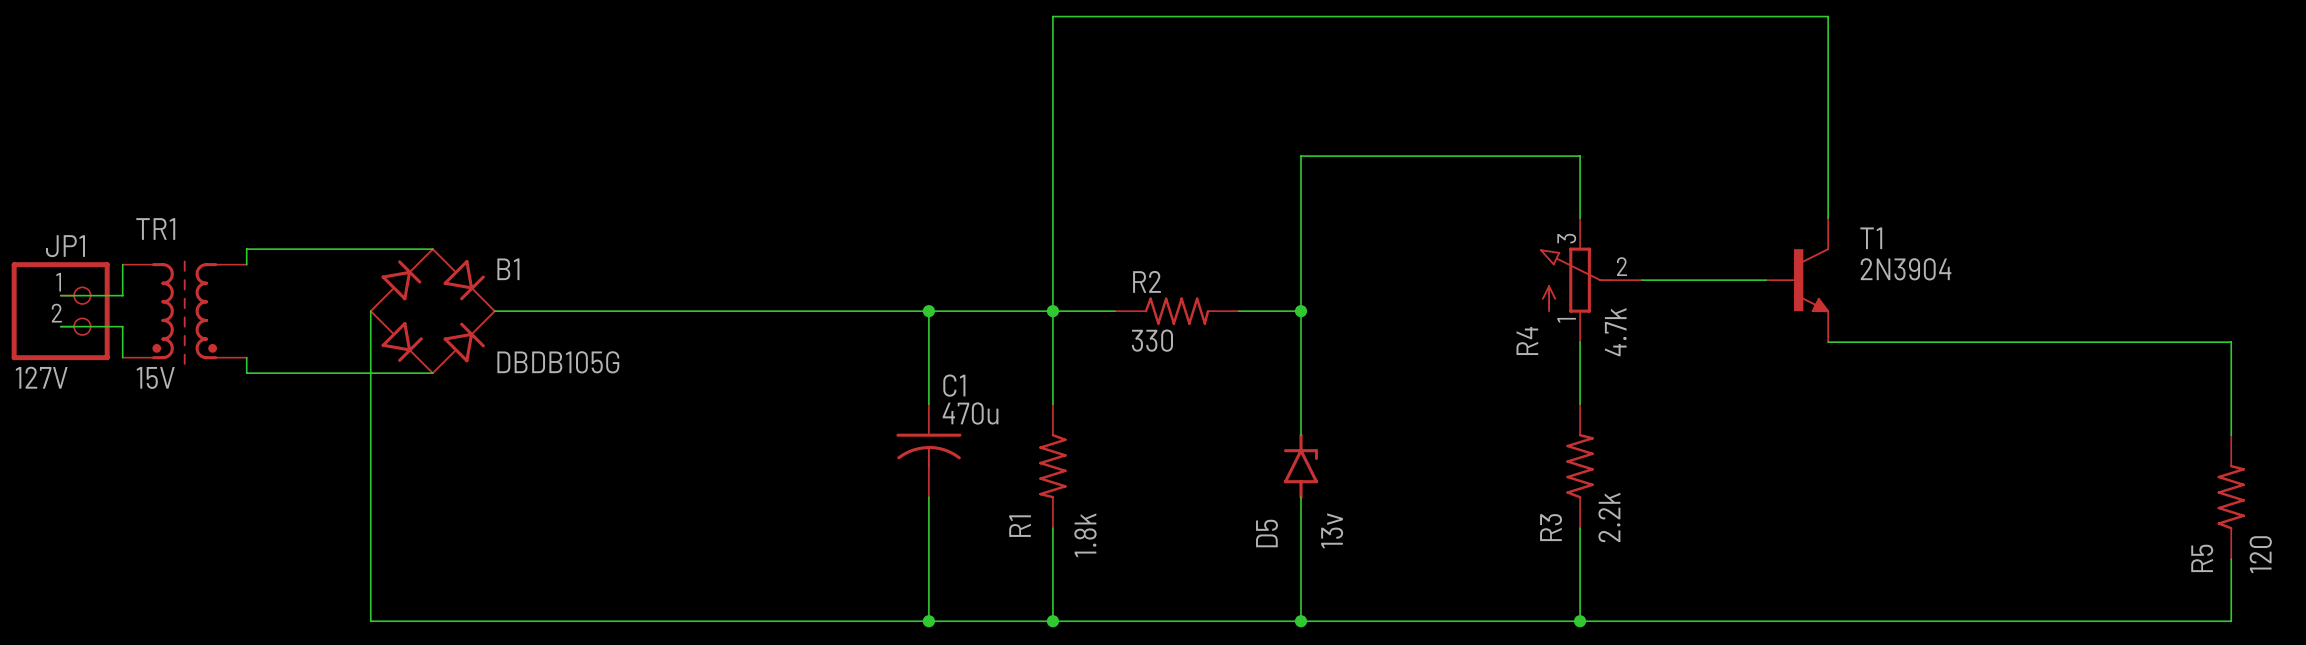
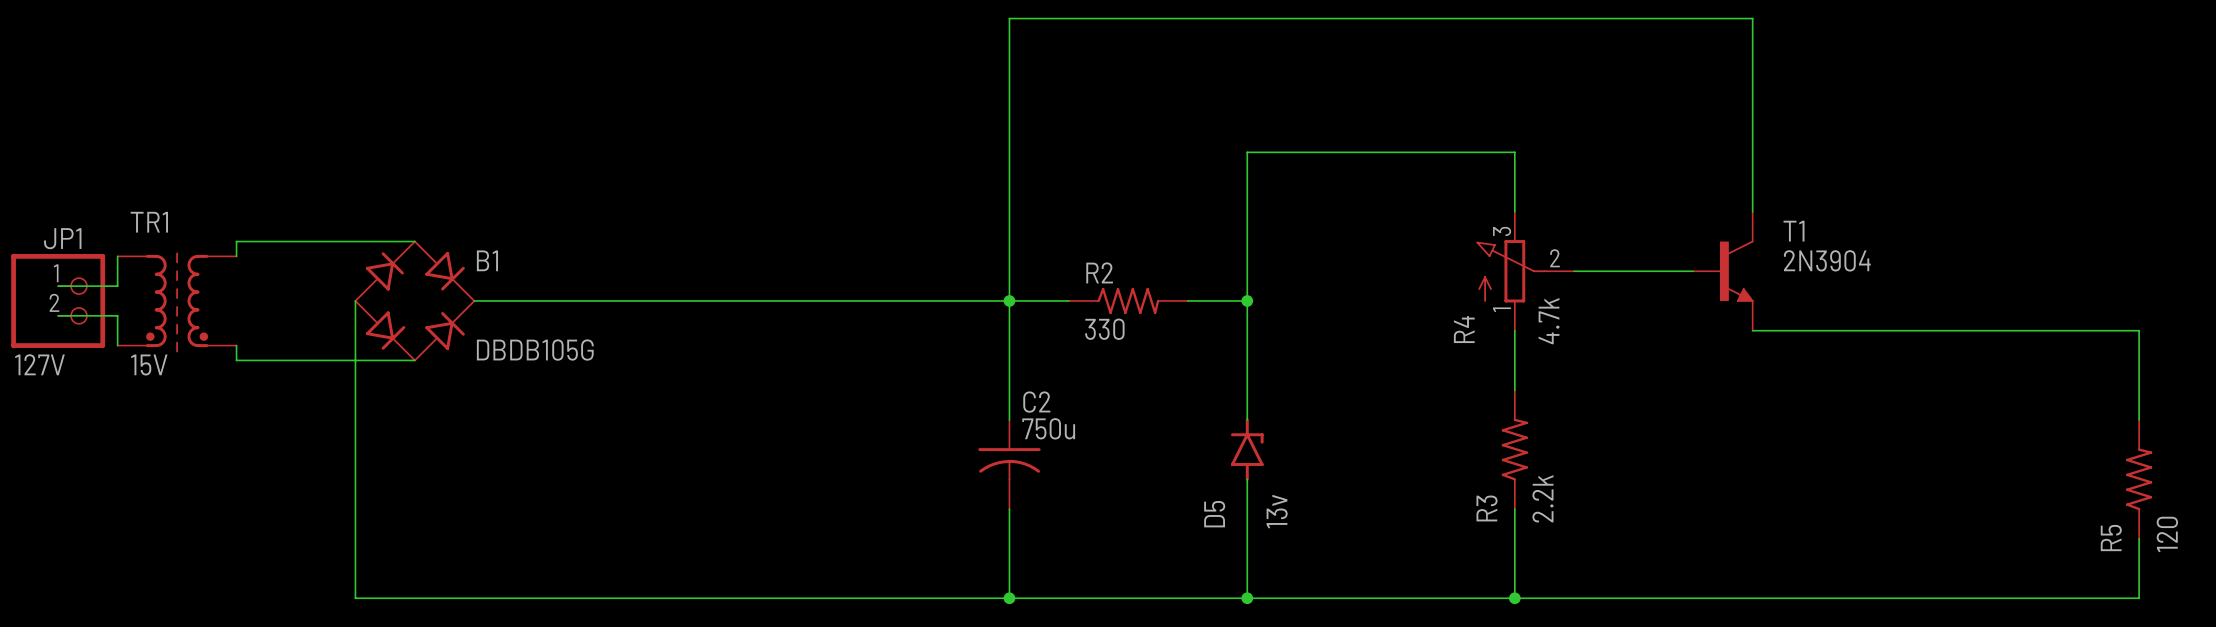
wire: (928, 311) (928, 404) -> none
junction: (928, 311) -> none
C1: 470u (928, 450) -> none
R1: 1.8k (1052, 466) -> none
C2: none -> 750u (1009, 464)
wire: (928, 497) (928, 621) -> none
junction: (928, 621) -> none

